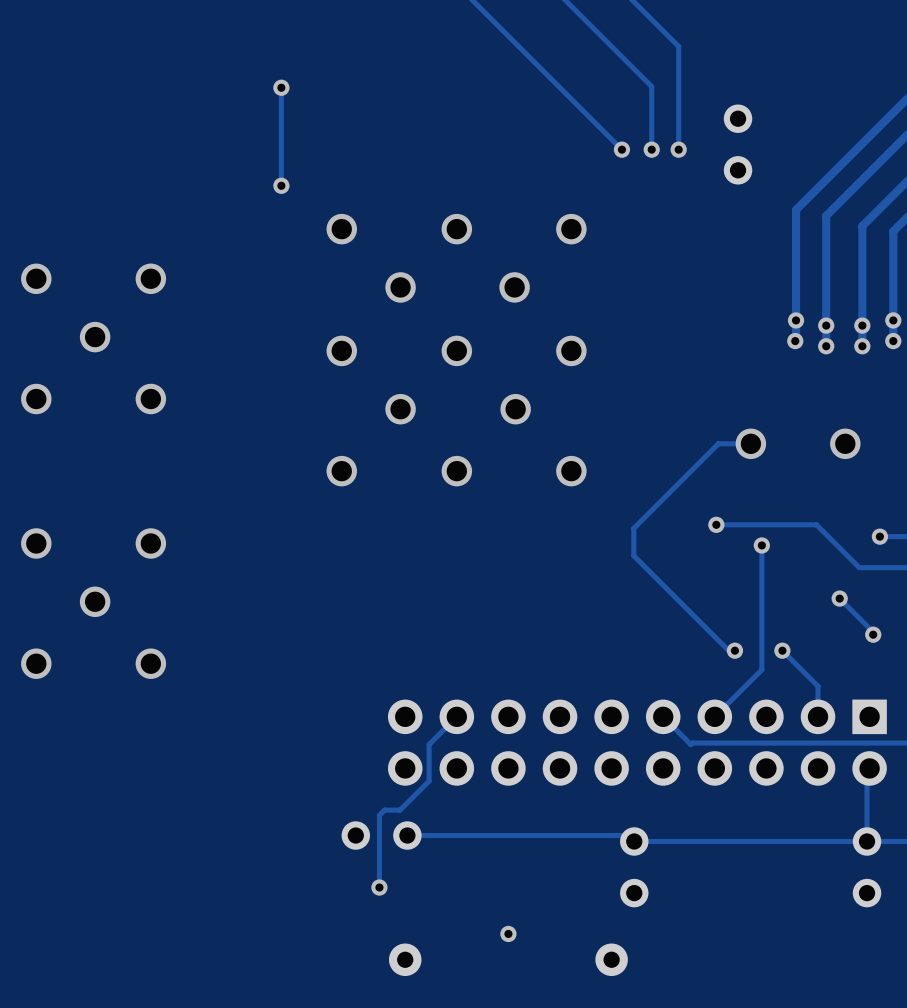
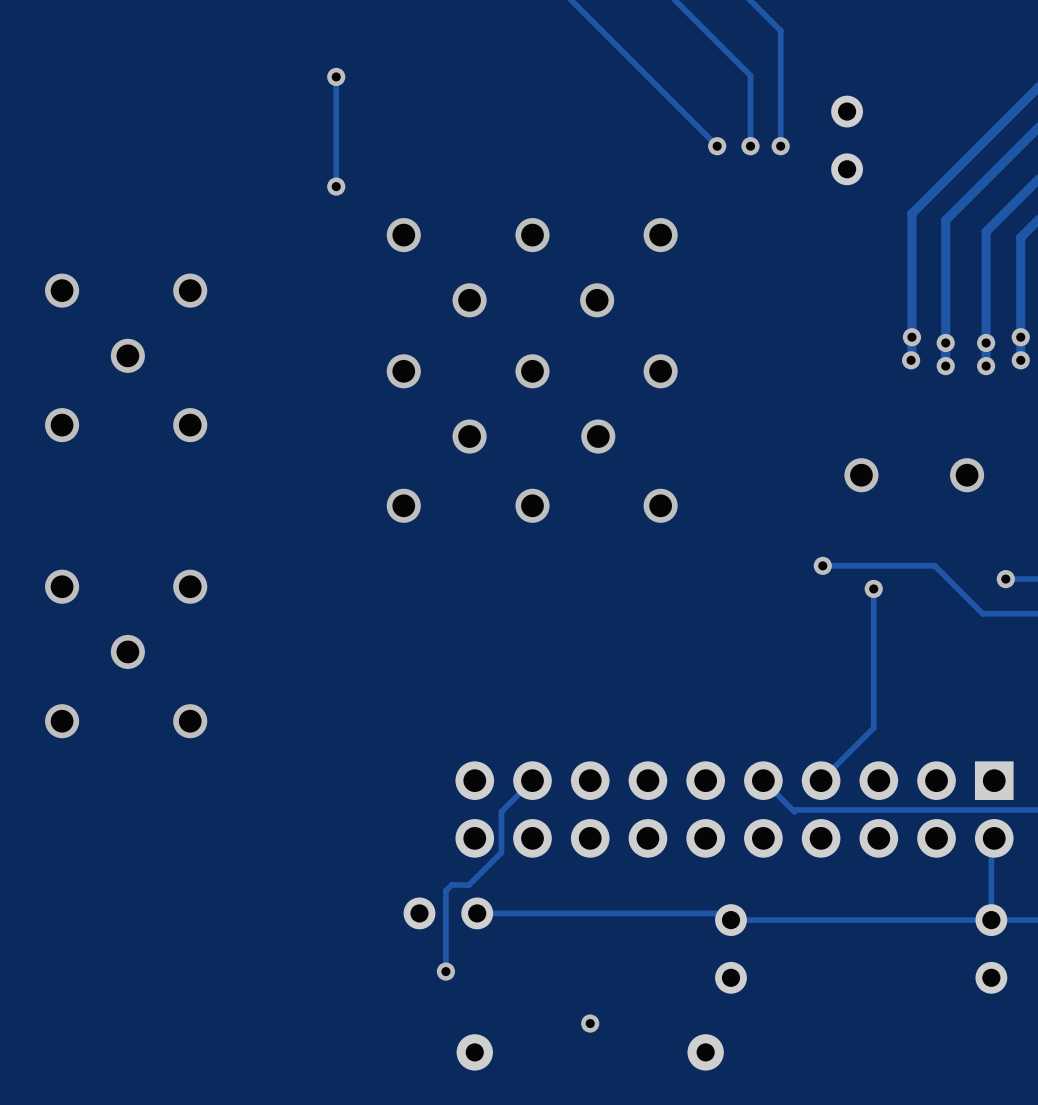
track: (750, 443) (718, 443) (633, 528) (633, 555) (728, 650) (734, 650) -> none
track: (839, 598) (873, 632) (873, 634) -> none
via: (839, 598) -> none
via: (873, 634) -> none
via: (734, 650) -> none
track: (782, 650) (818, 686) (818, 716) -> none
via: (782, 650) -> none

